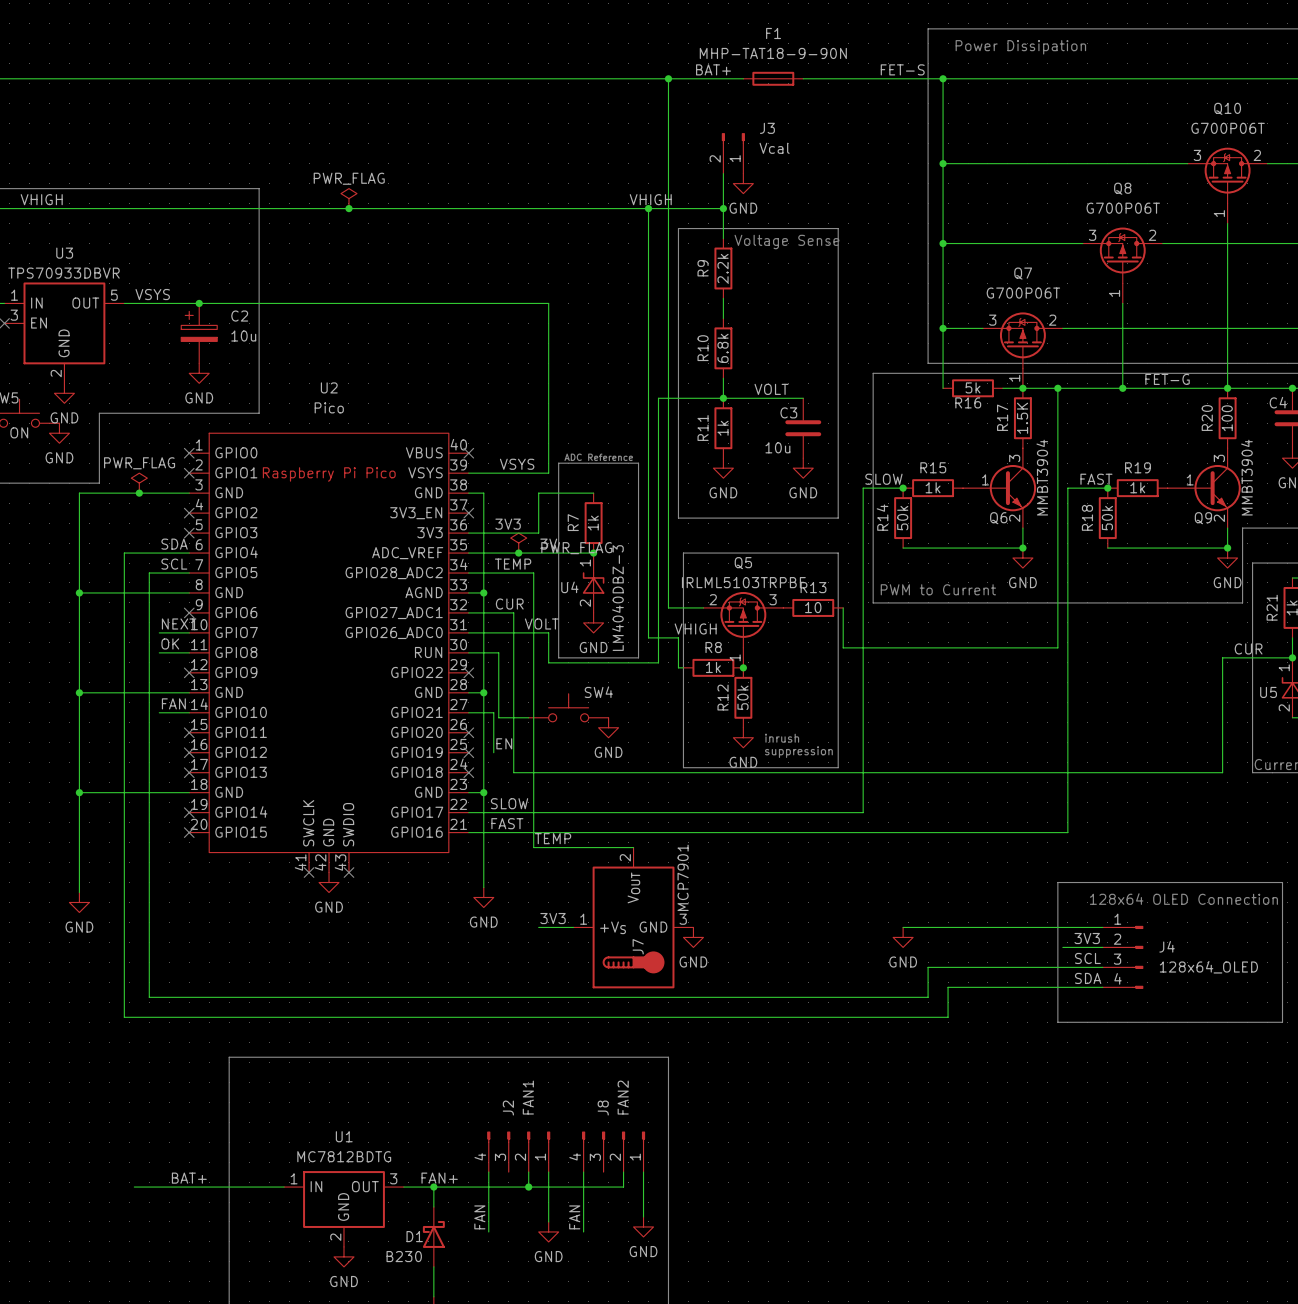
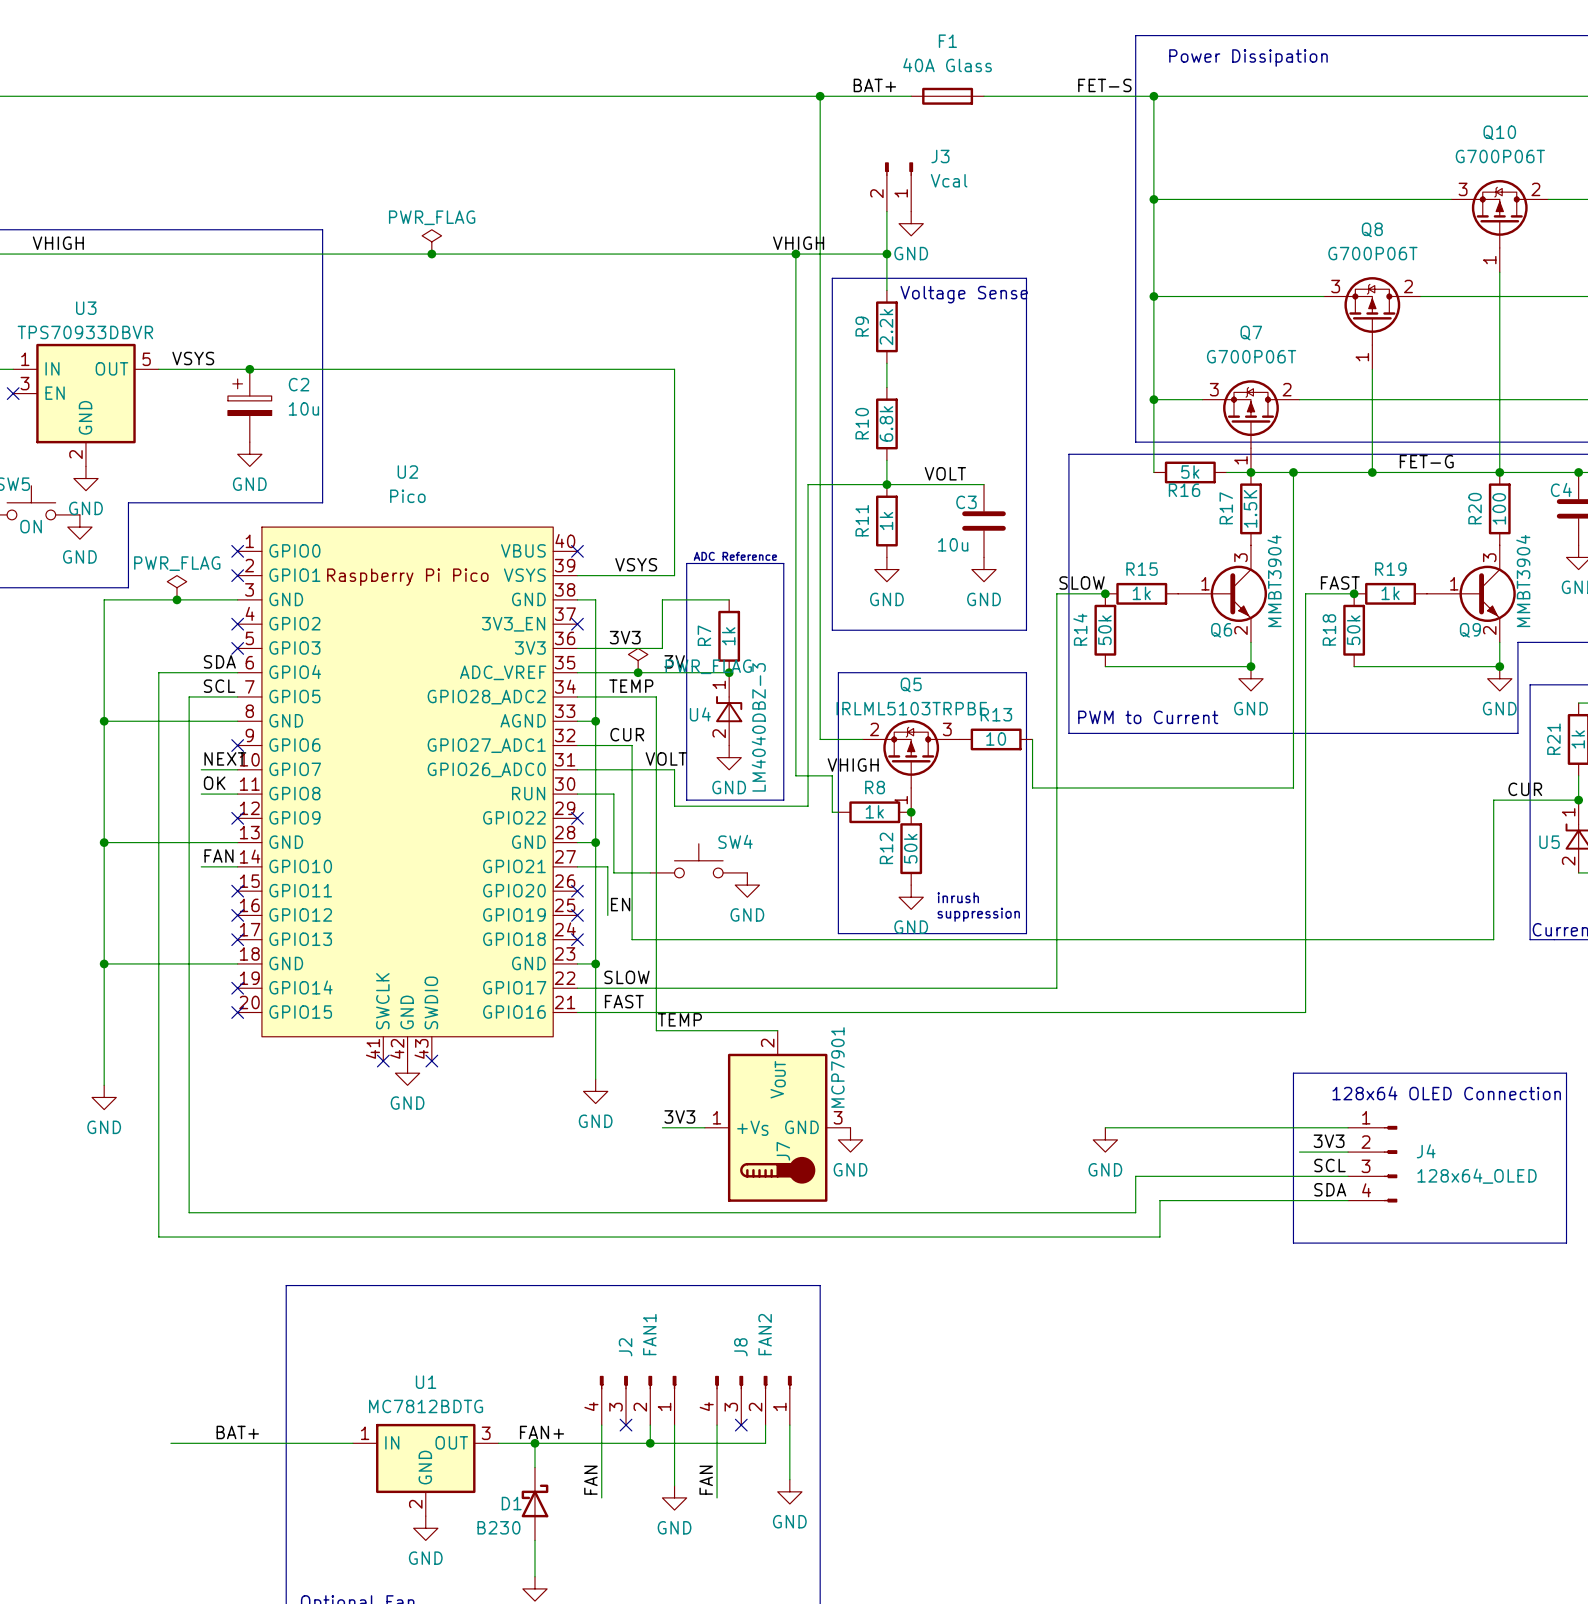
F1 value: MHP-TAT18-9-90N (773, 53) -> 40A Glass (947, 65)
no-connect mark: none -> (626, 1425)
no-connect mark: none -> (741, 1425)

